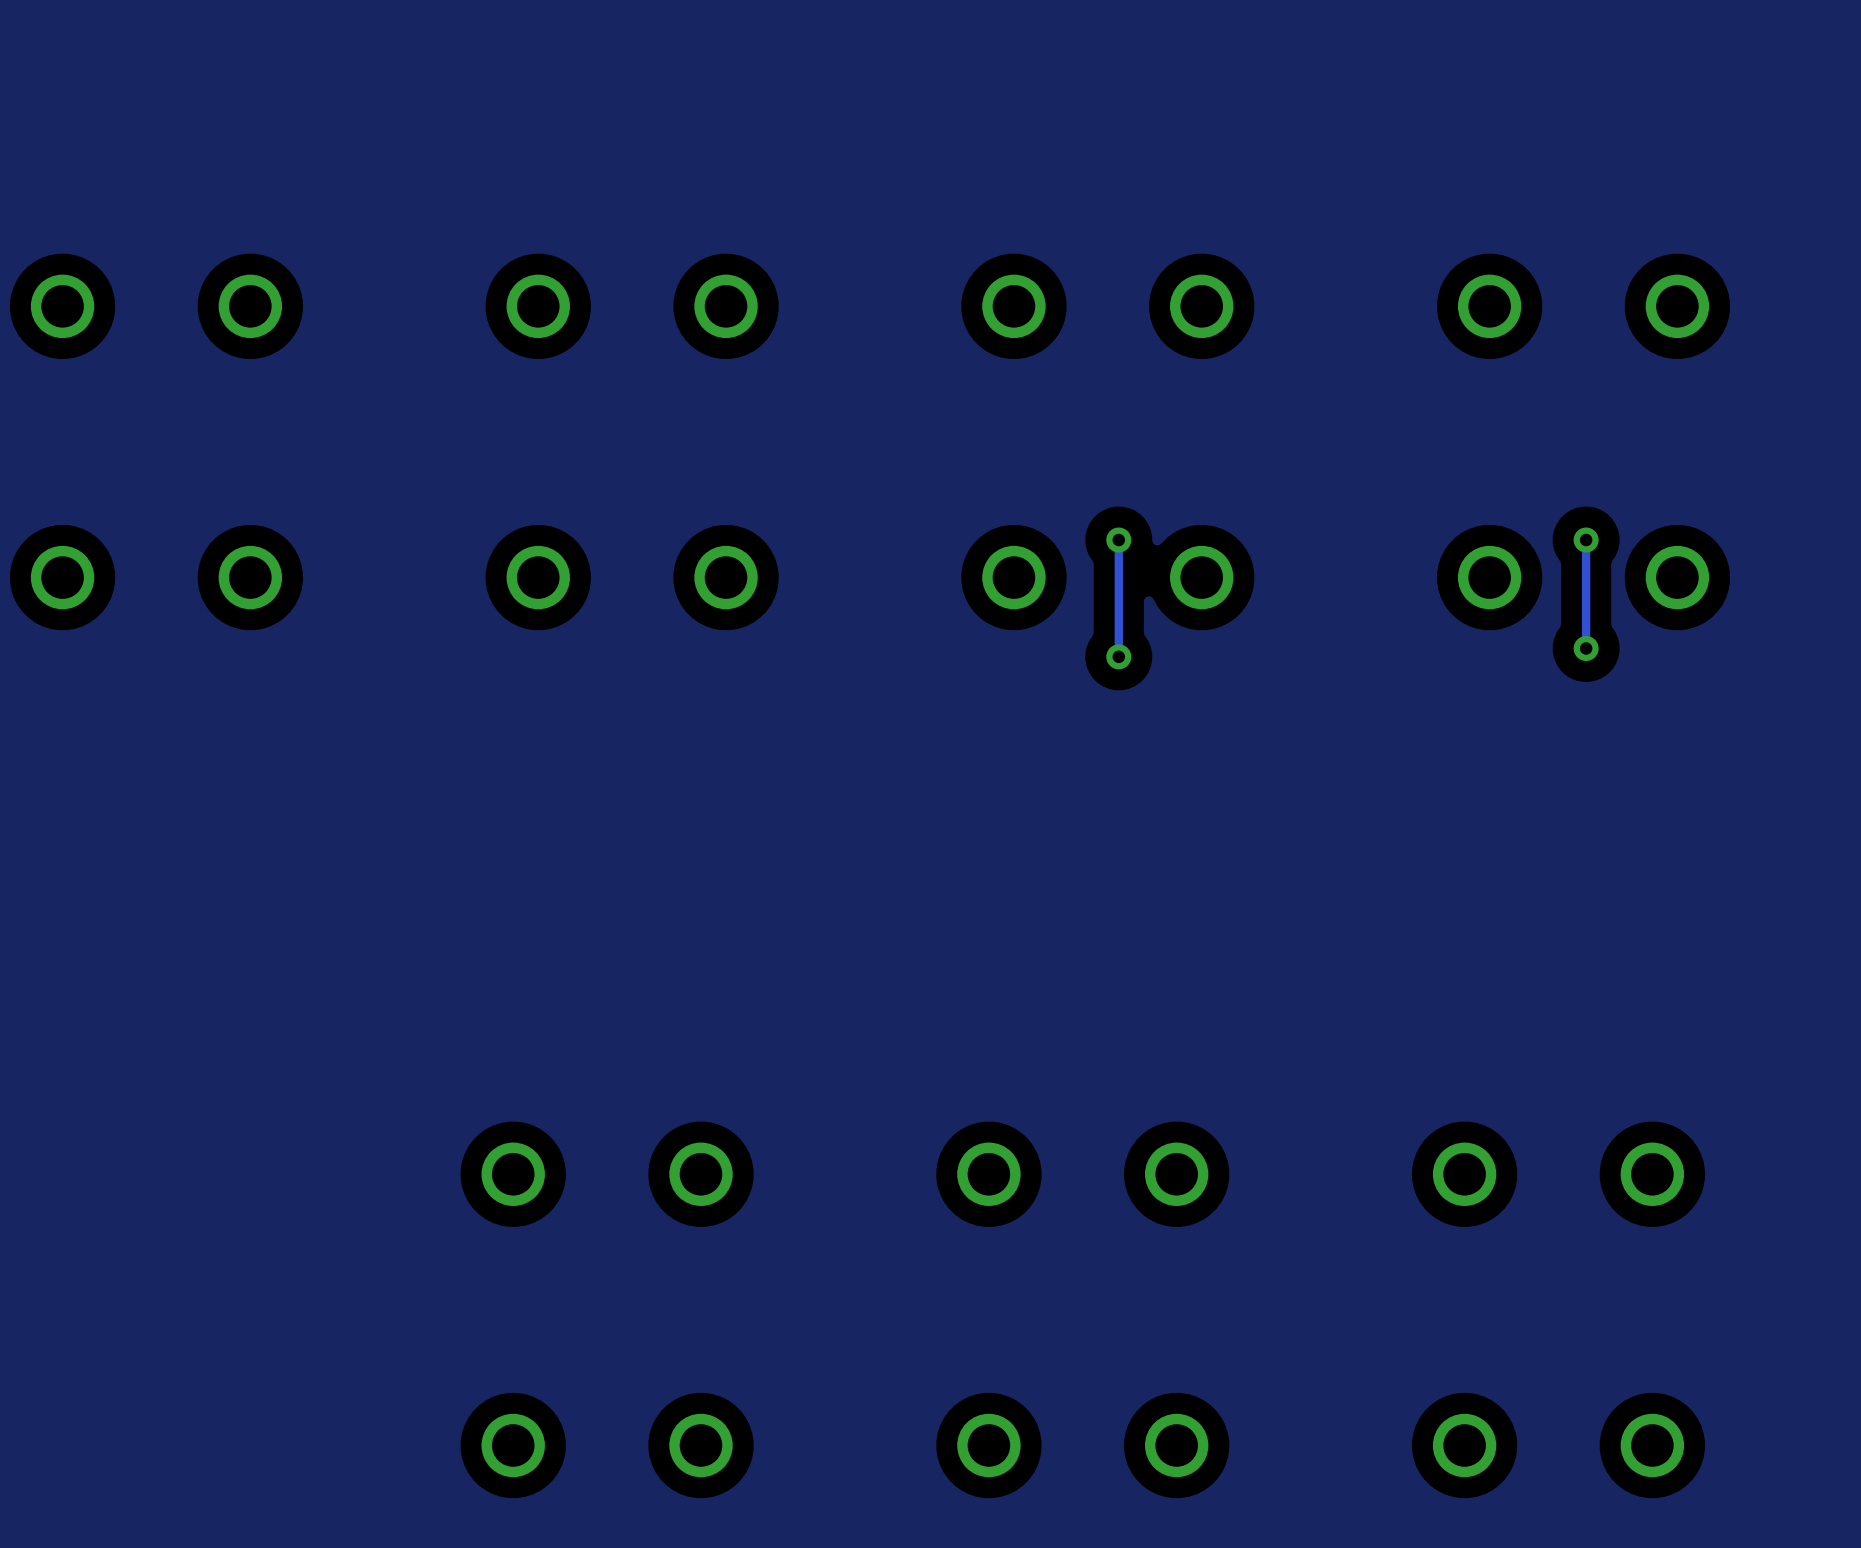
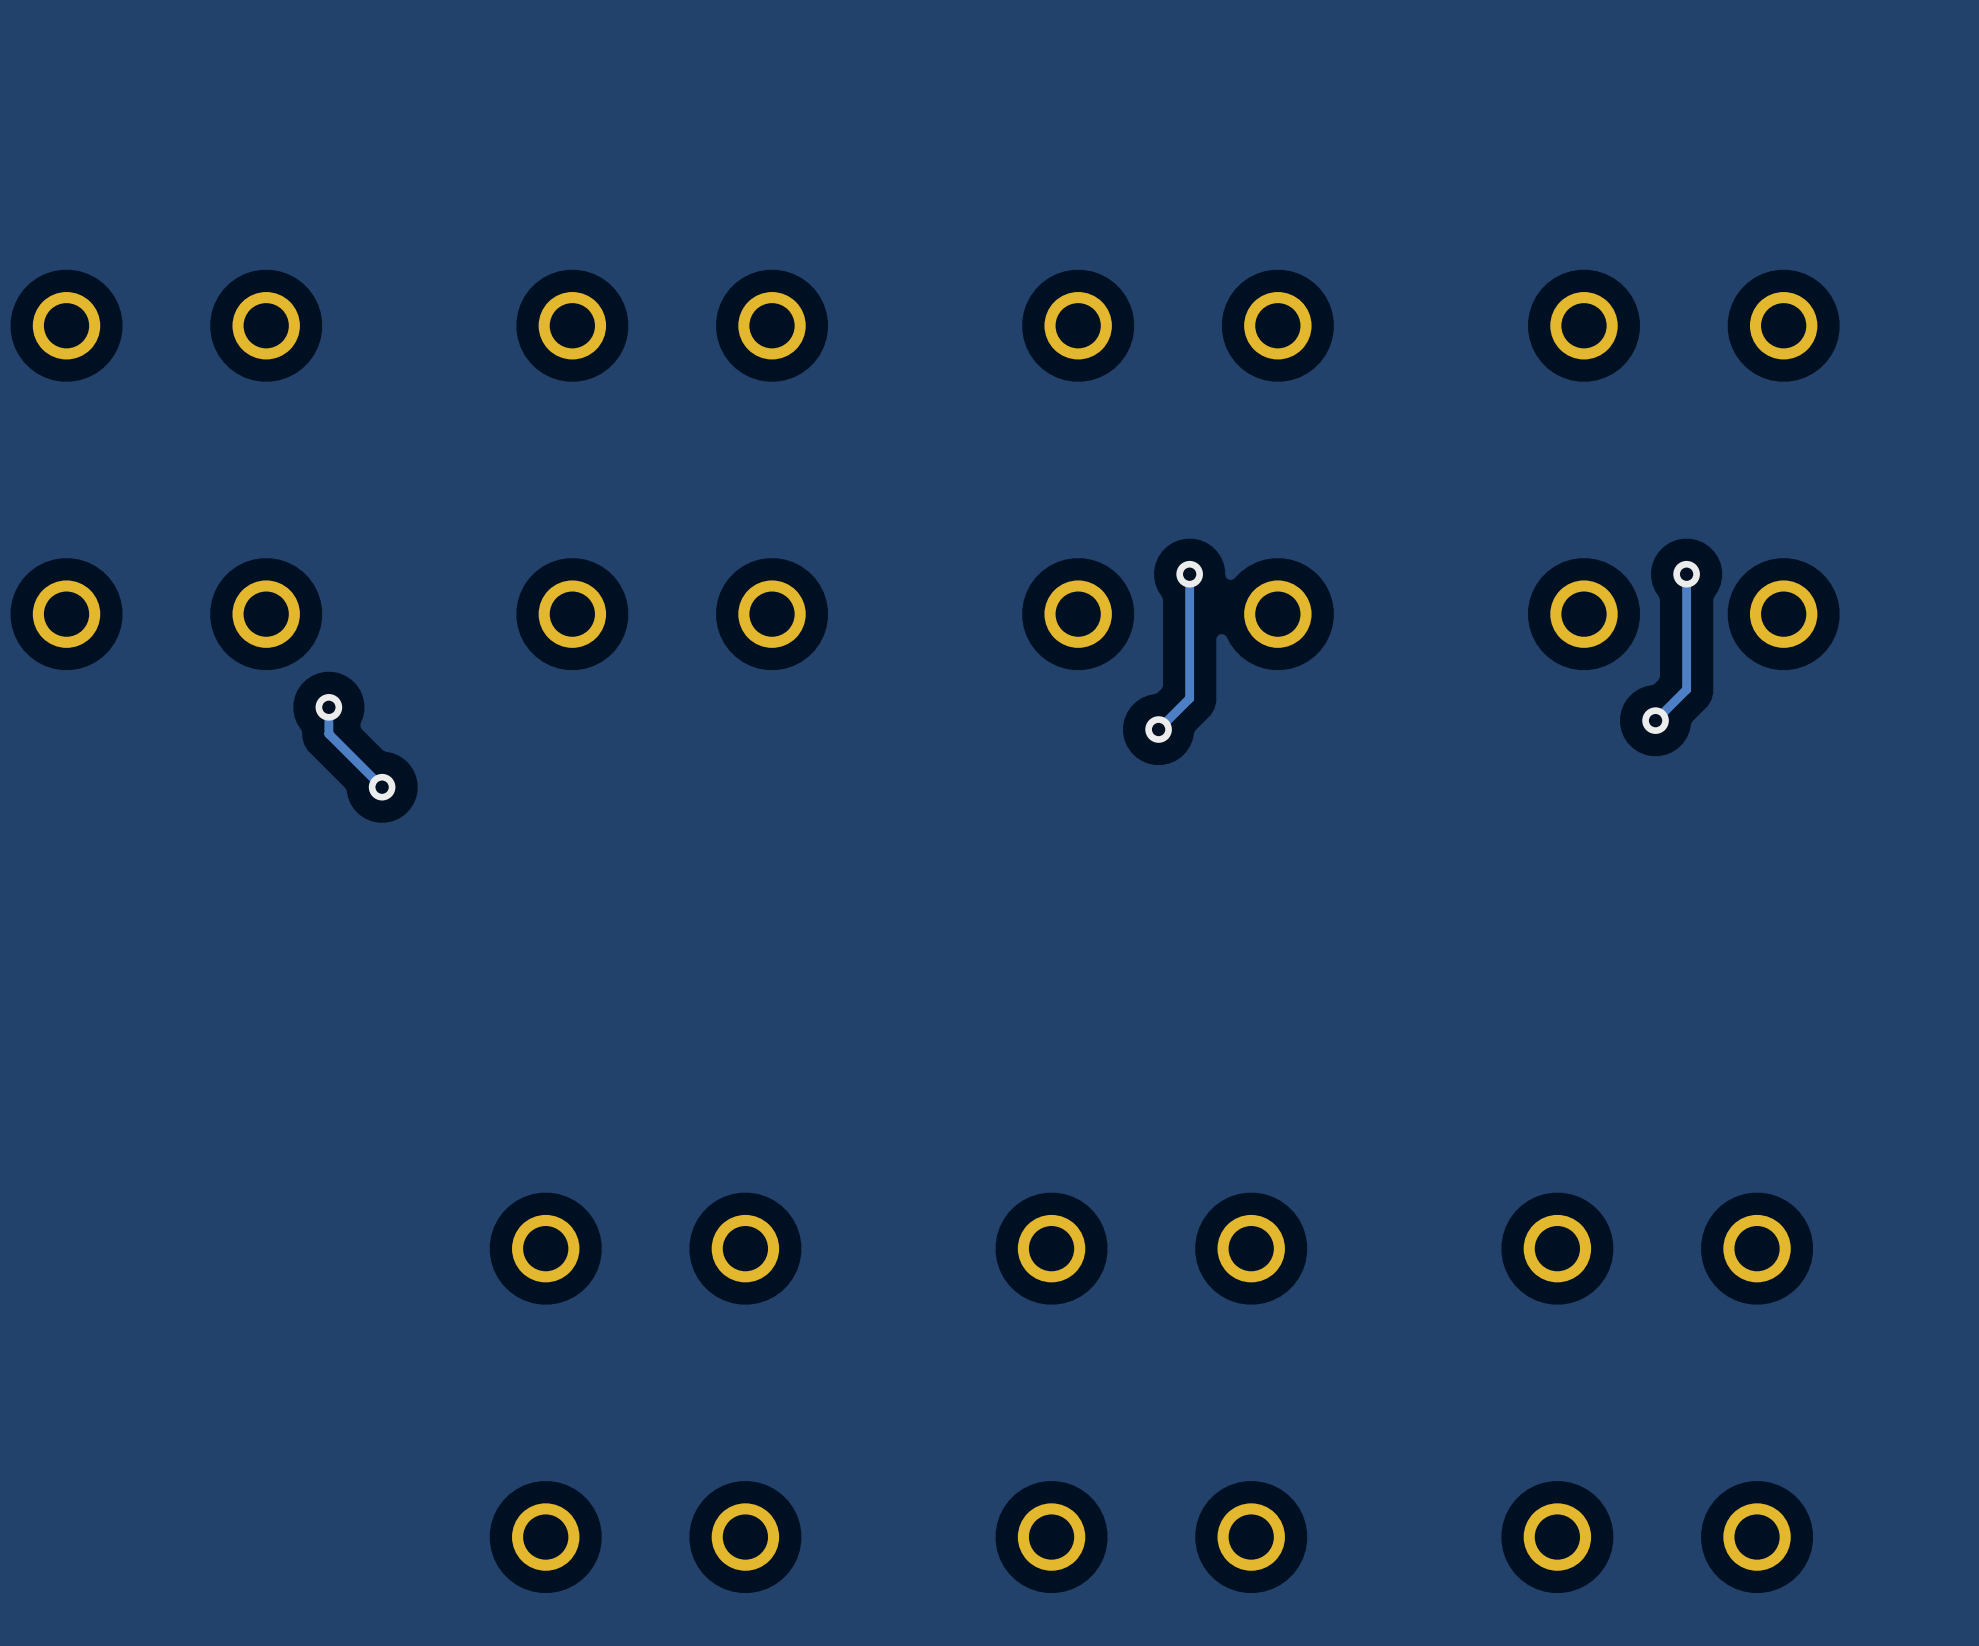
track: none -> (1686, 689) (1655, 720)
via position: (1586, 648) -> (1655, 720)
track: none -> (1189, 698) (1158, 729)
via position: (1118, 656) -> (1158, 729)
track: none -> (328, 707) (328, 733) (382, 787)
via: none -> (328, 707)
via: none -> (382, 787)

